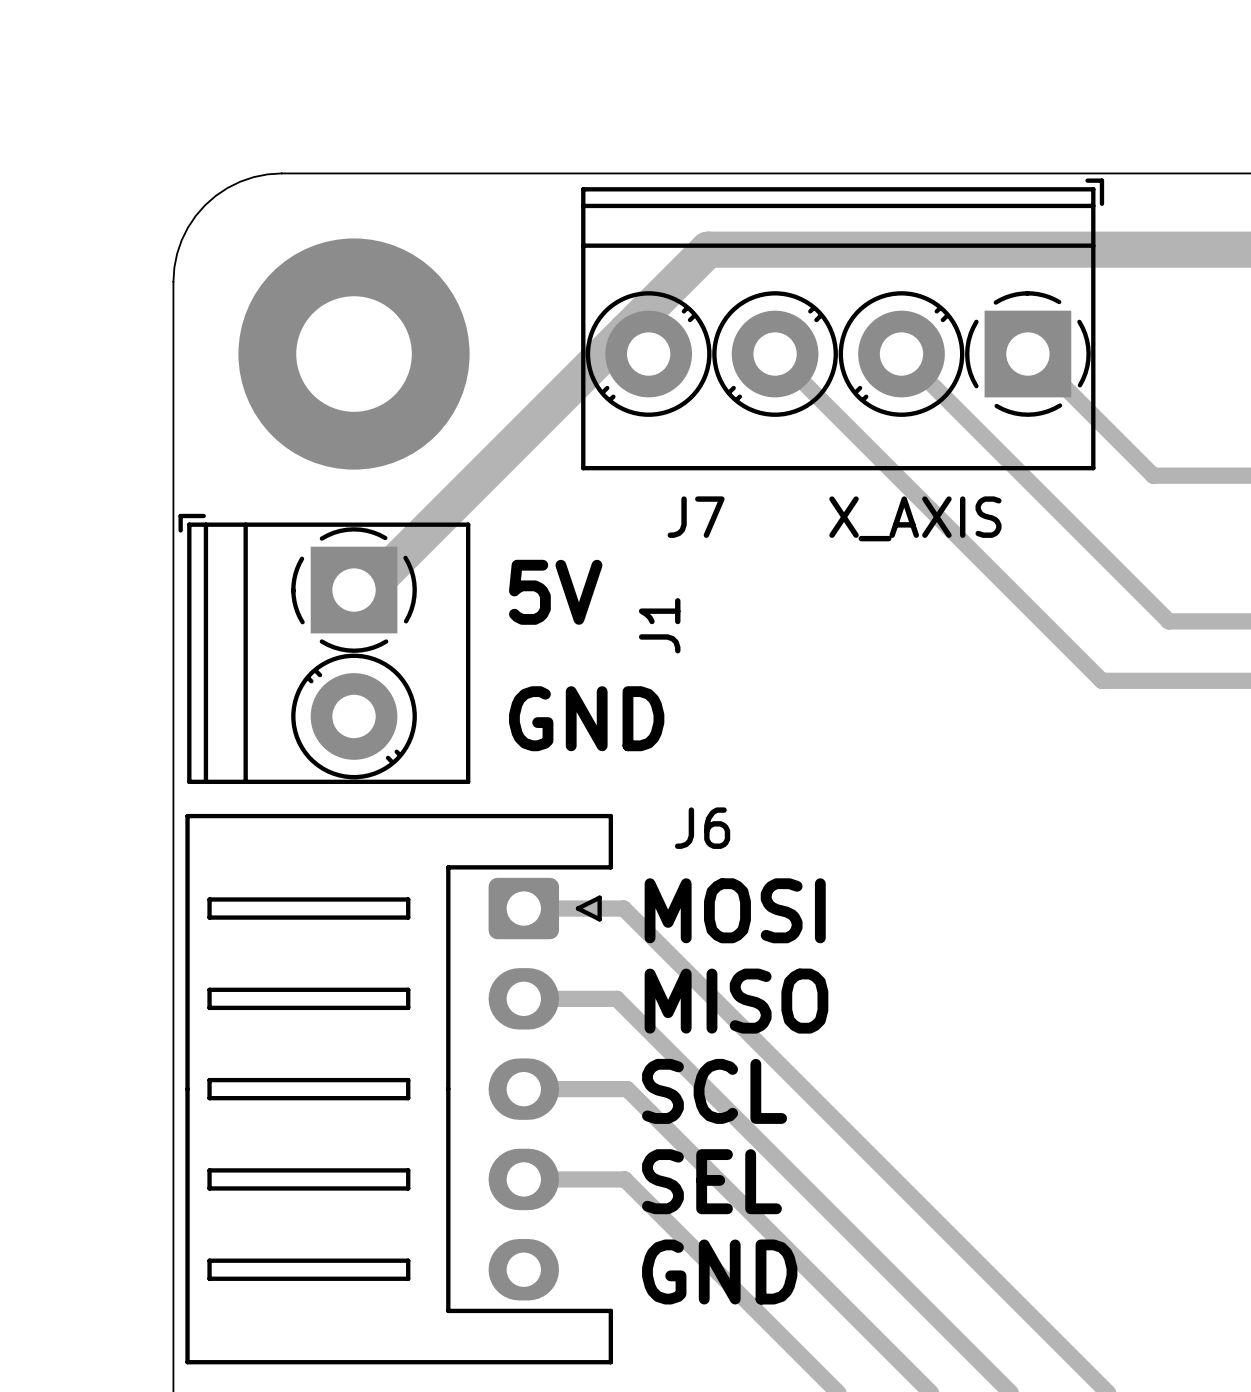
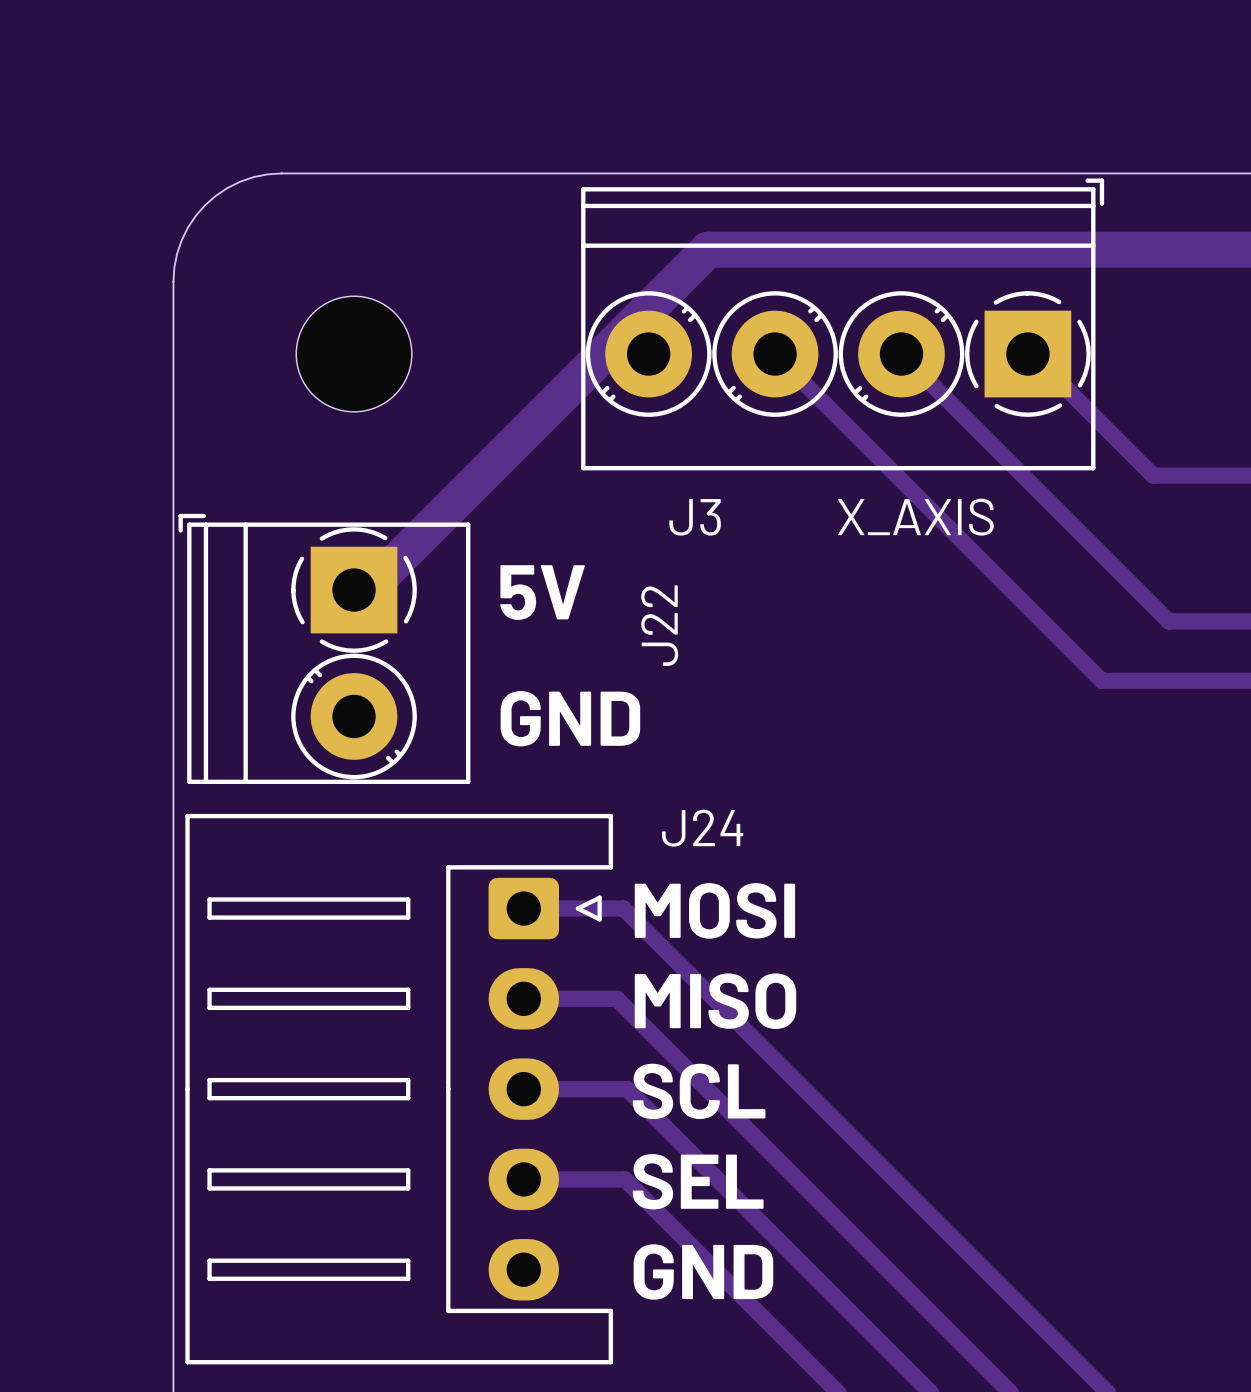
part footprint: [238, 238, 470, 470] -> [296, 296, 412, 412]
J7 name: J7 (696, 517) -> J3 (695, 517)
J1 name: J1 (659, 625) -> J22 (659, 625)
J6 name: J6 (702, 828) -> J24 (702, 828)

